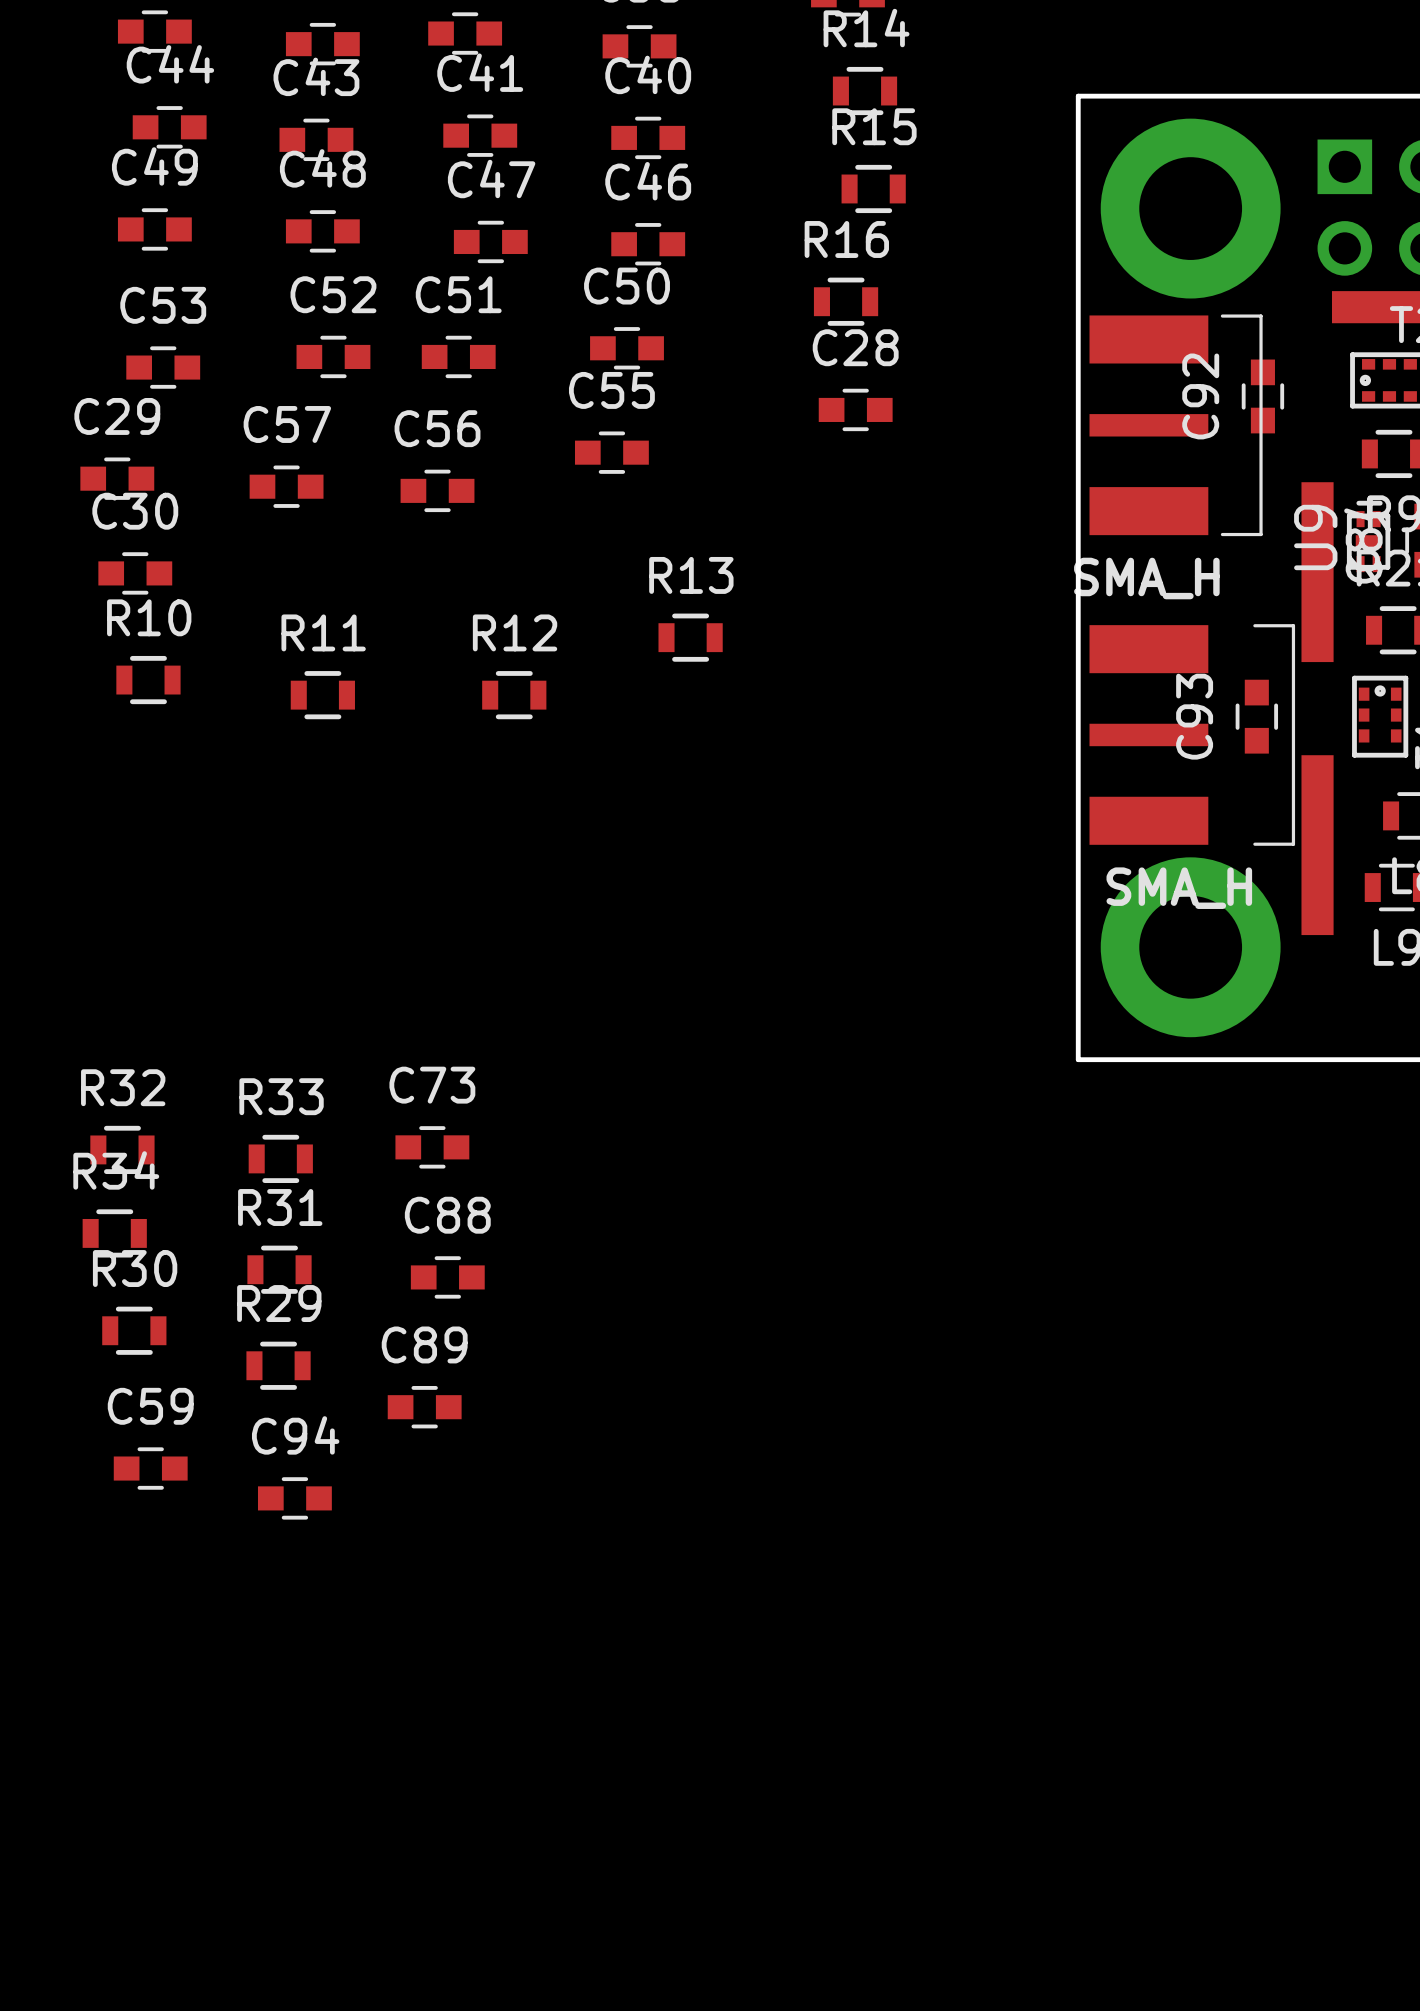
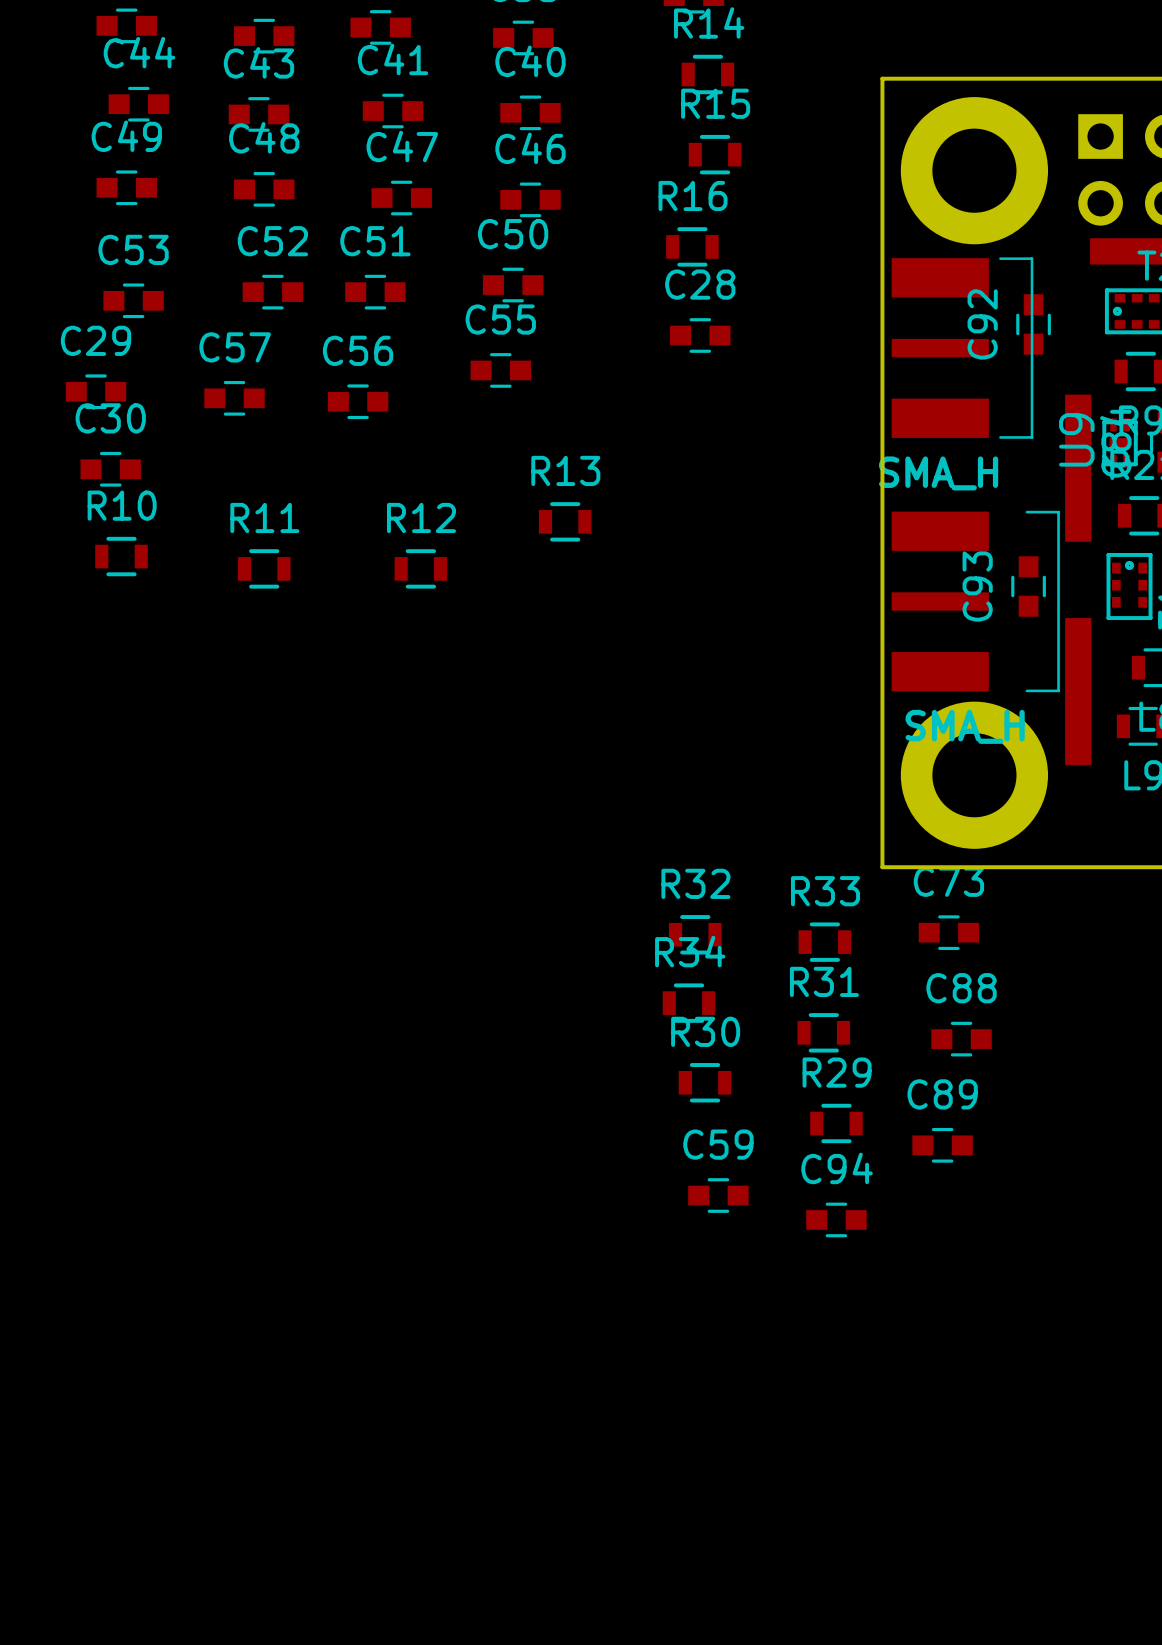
C73 position: (432, 1147) -> (948, 932)
R32 position: (122, 1149) -> (695, 934)
R33 position: (280, 1158) -> (824, 942)
R34 position: (114, 1233) -> (688, 1003)
R31 position: (279, 1269) -> (823, 1032)
C88 position: (447, 1277) -> (961, 1039)
R30 position: (134, 1330) -> (705, 1082)
R29 position: (278, 1365) -> (836, 1123)
C89 position: (424, 1407) -> (942, 1145)
C59 position: (150, 1468) -> (718, 1195)
C94 position: (294, 1498) -> (836, 1219)

